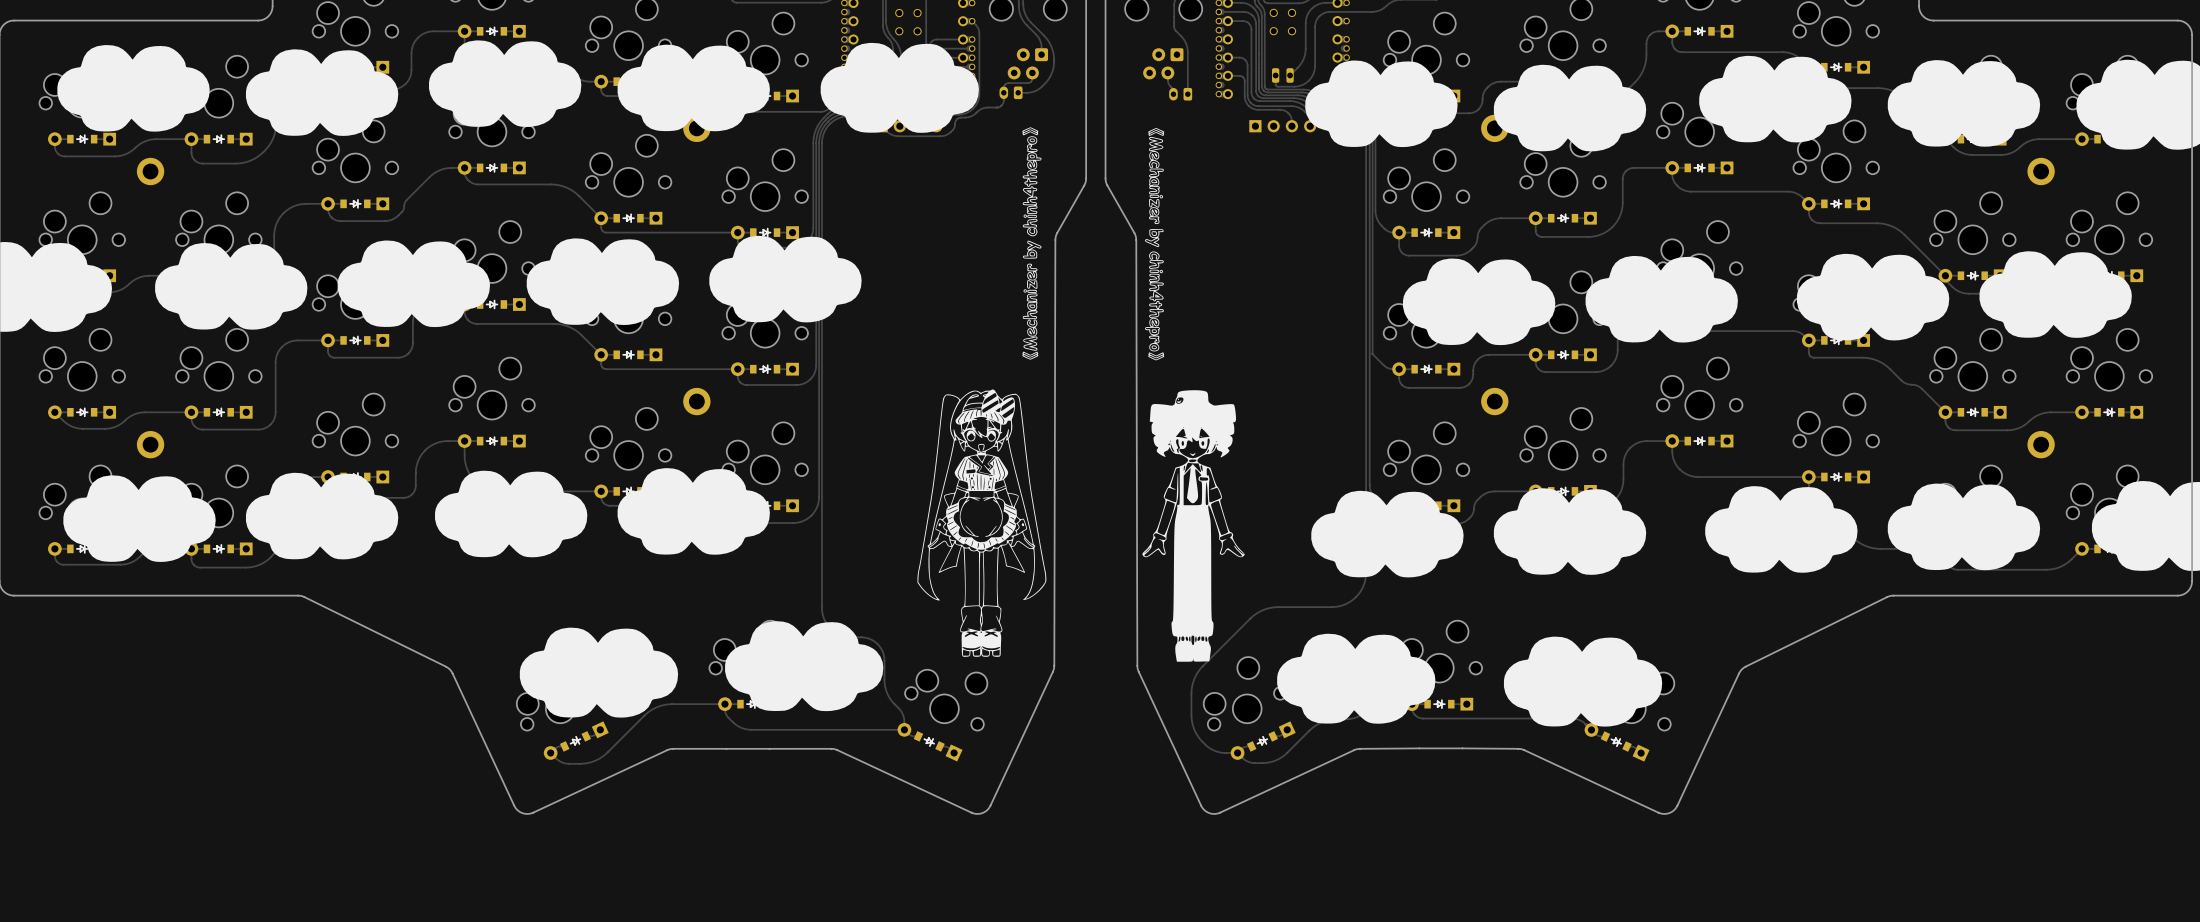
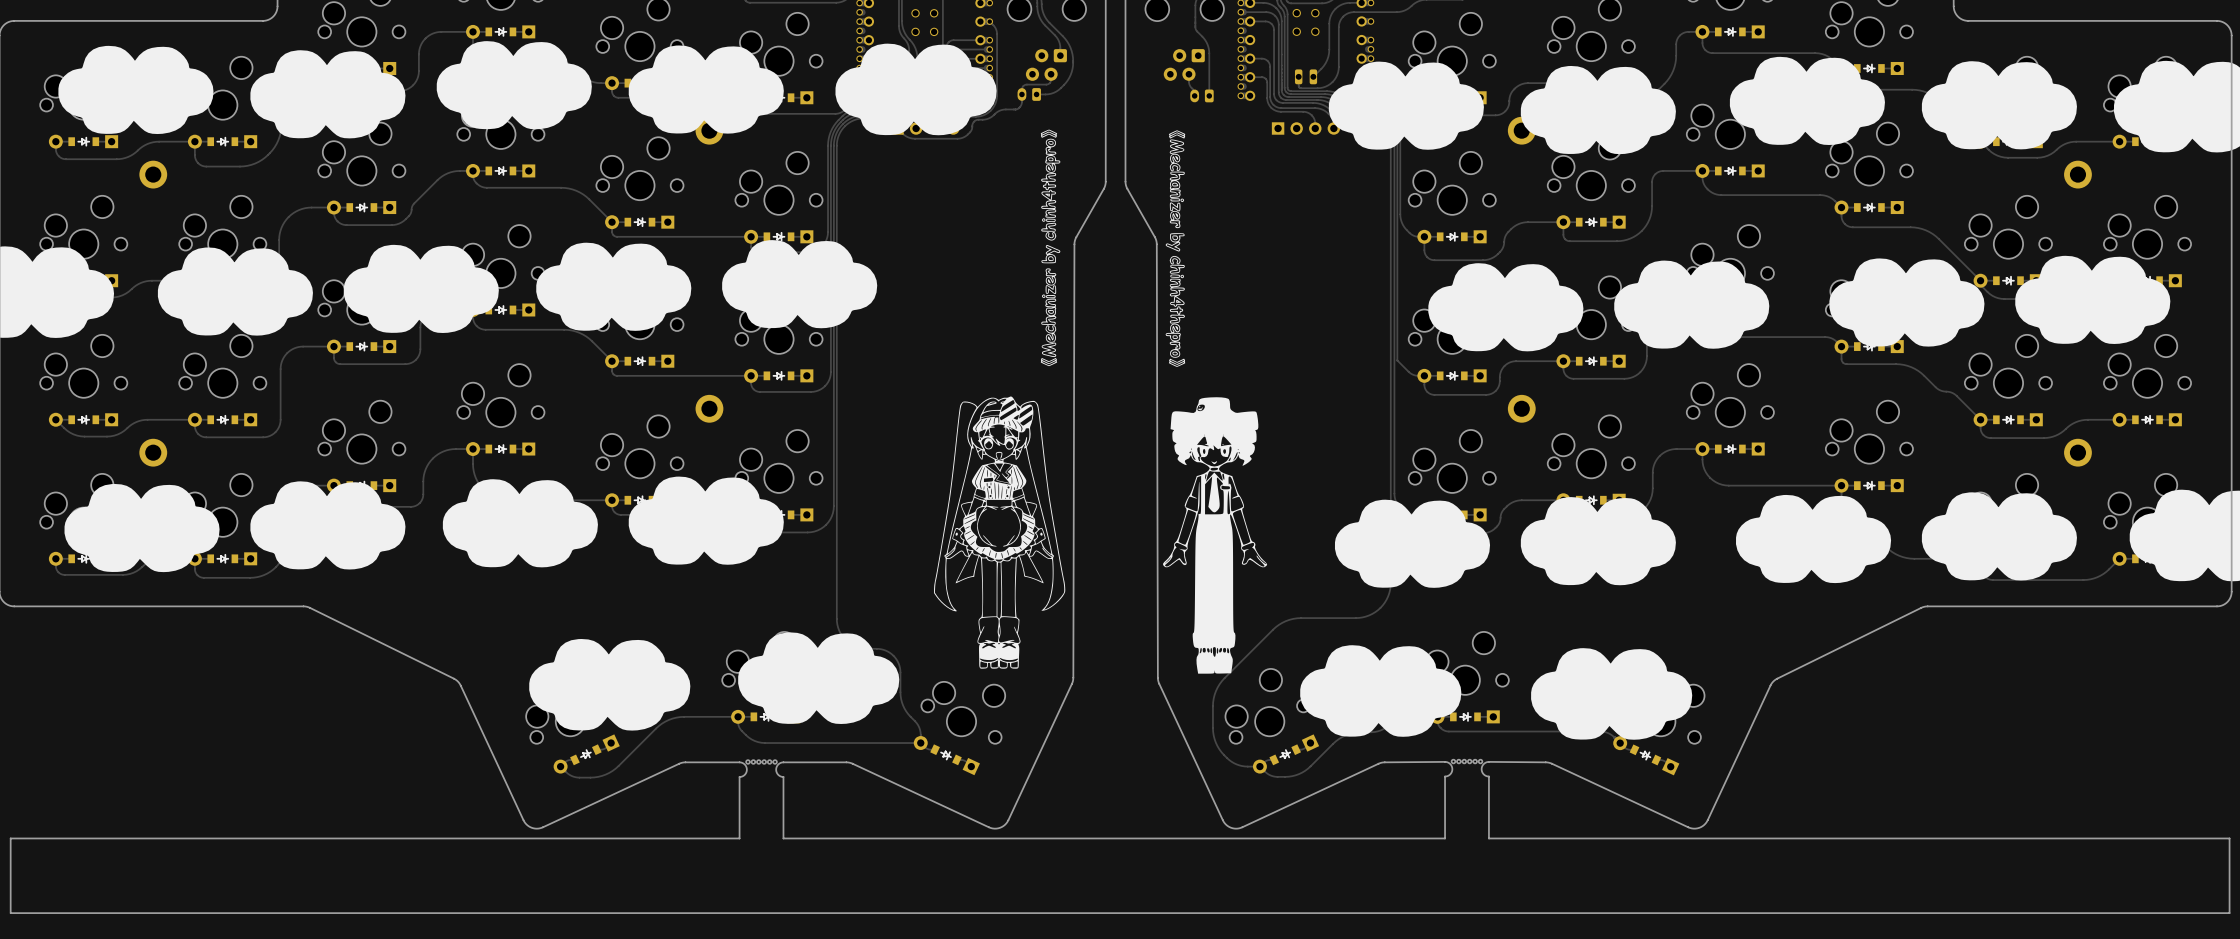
board edge: (726, 748) (769, 748) -> none
board edge: (1419, 748) (1462, 748) -> none
part: none -> (1467, 768)
part: none -> (761, 768)
board edge: none -> (1445, 776) (1445, 838) (783, 838) (783, 776)
board edge: none -> (1488, 776) (1488, 838) (2229, 838) (2229, 913) (10, 913) (10, 838) (739, 838) (739, 776)

